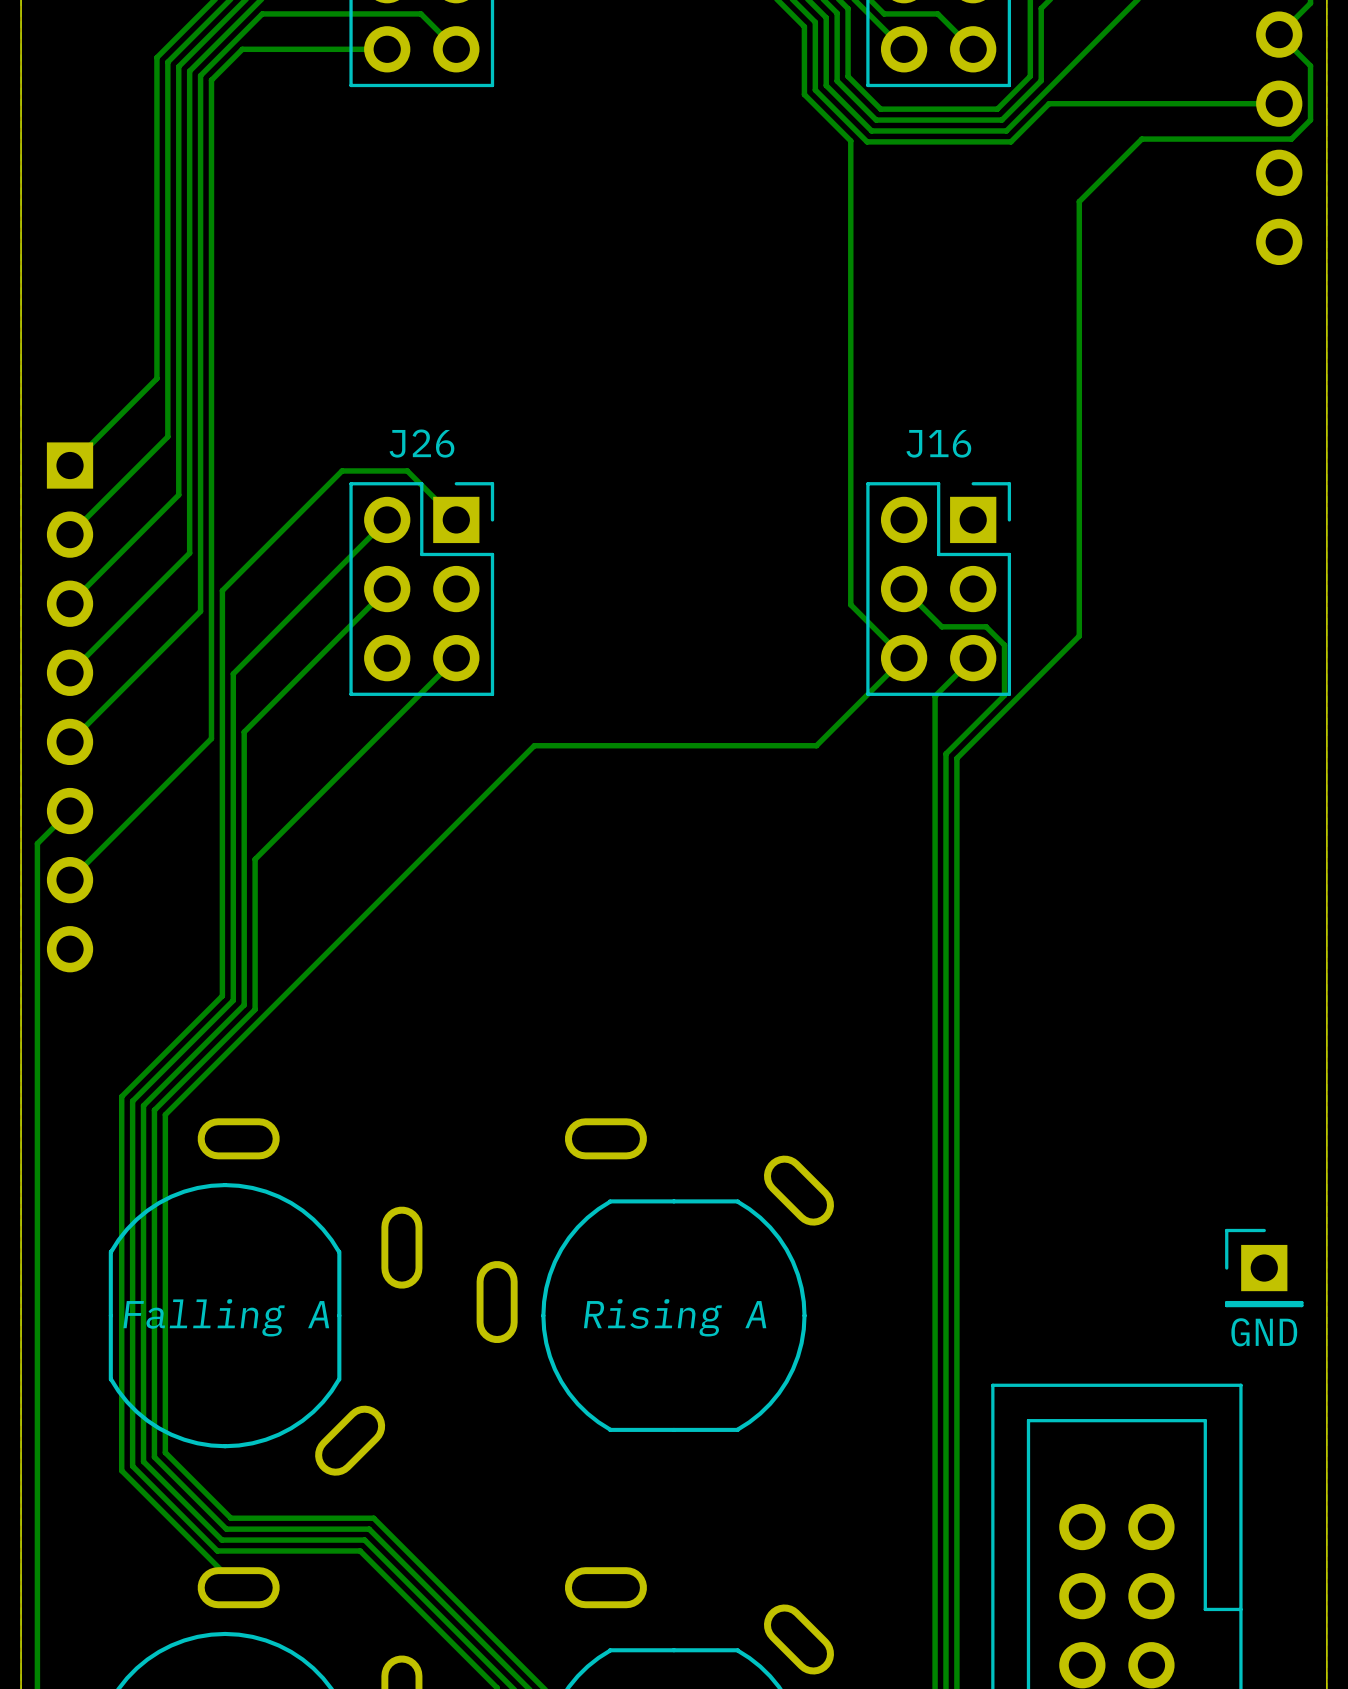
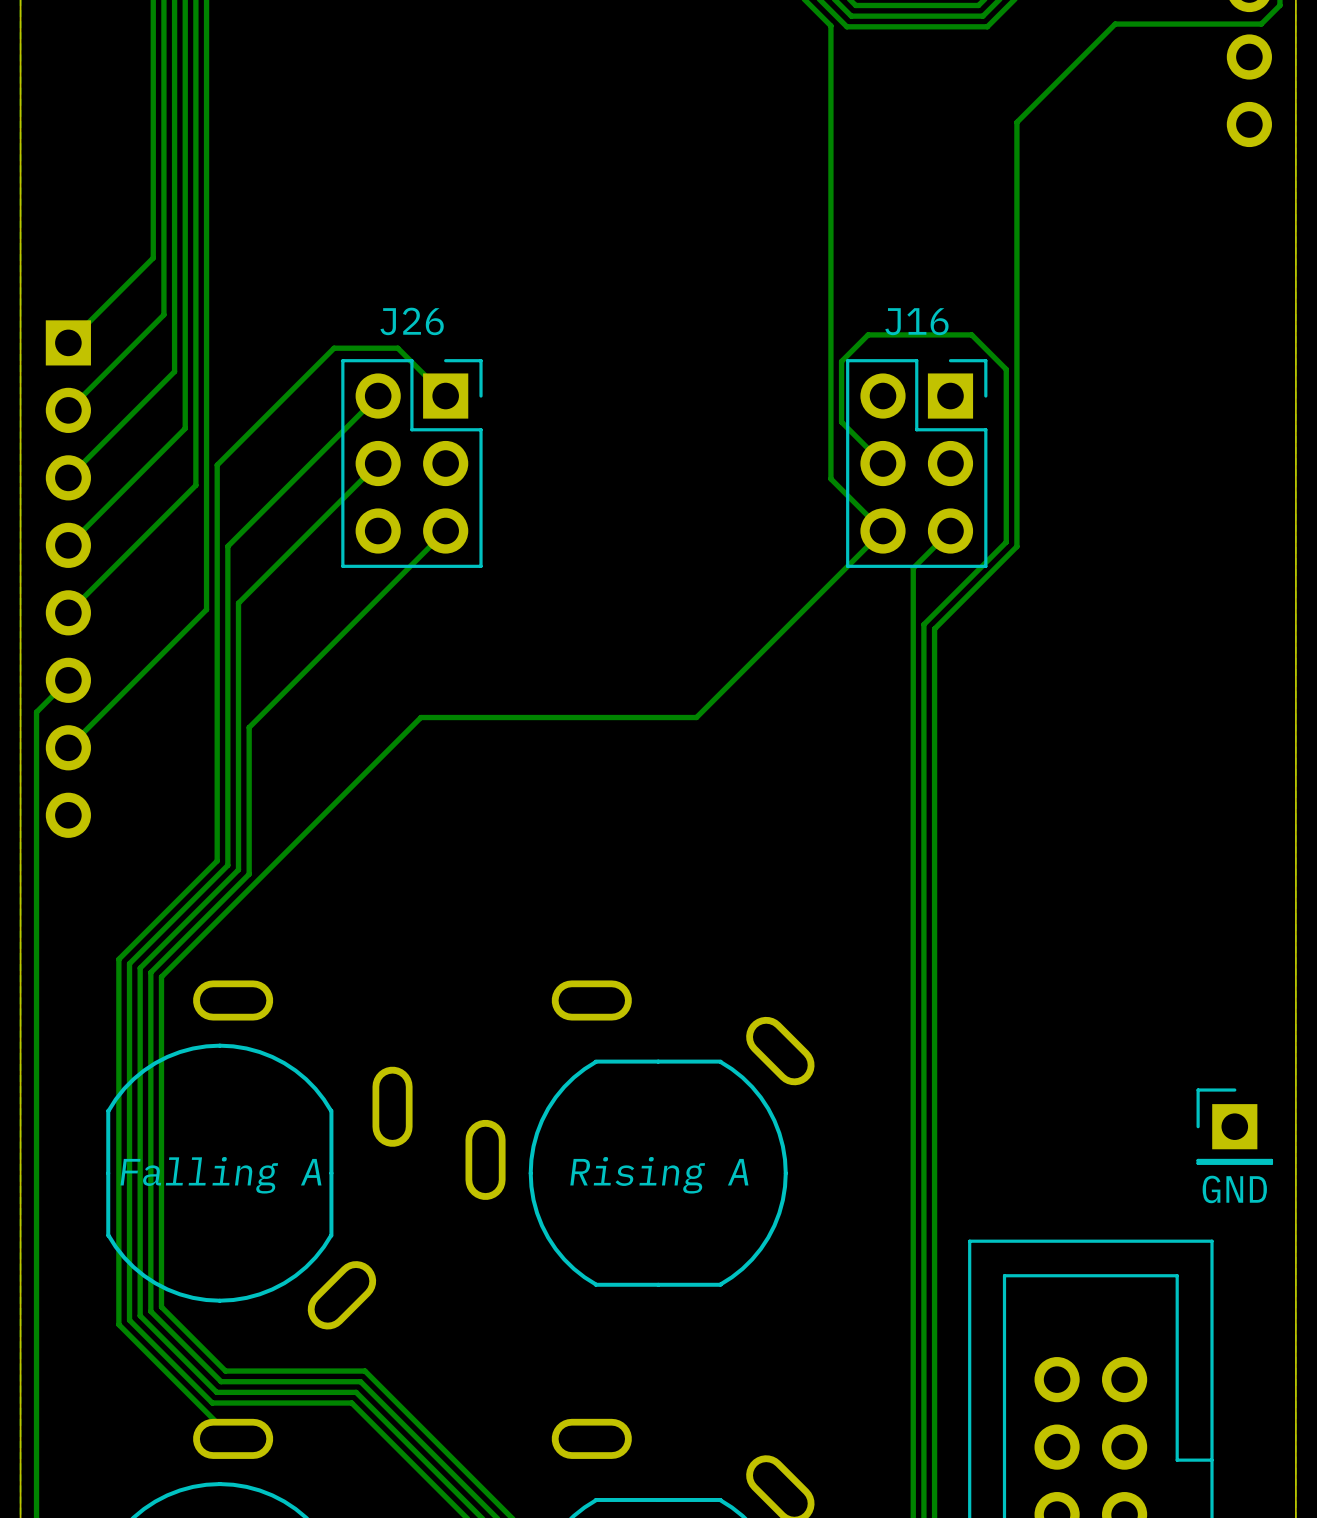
track: (1079, 201) (1079, 636) (1041, 674) -> (1054, 85) (1016, 122) (1016, 546)
track: (904, 589) (941, 626) (986, 626) (1004, 645) (1004, 695) -> (883, 463) (841, 422) (841, 361) (868, 334) (971, 334) (1006, 369) (1006, 542) (981, 567)
track: (816, 745) (534, 745) (430, 849) -> (797, 616) (696, 717) (420, 717)

